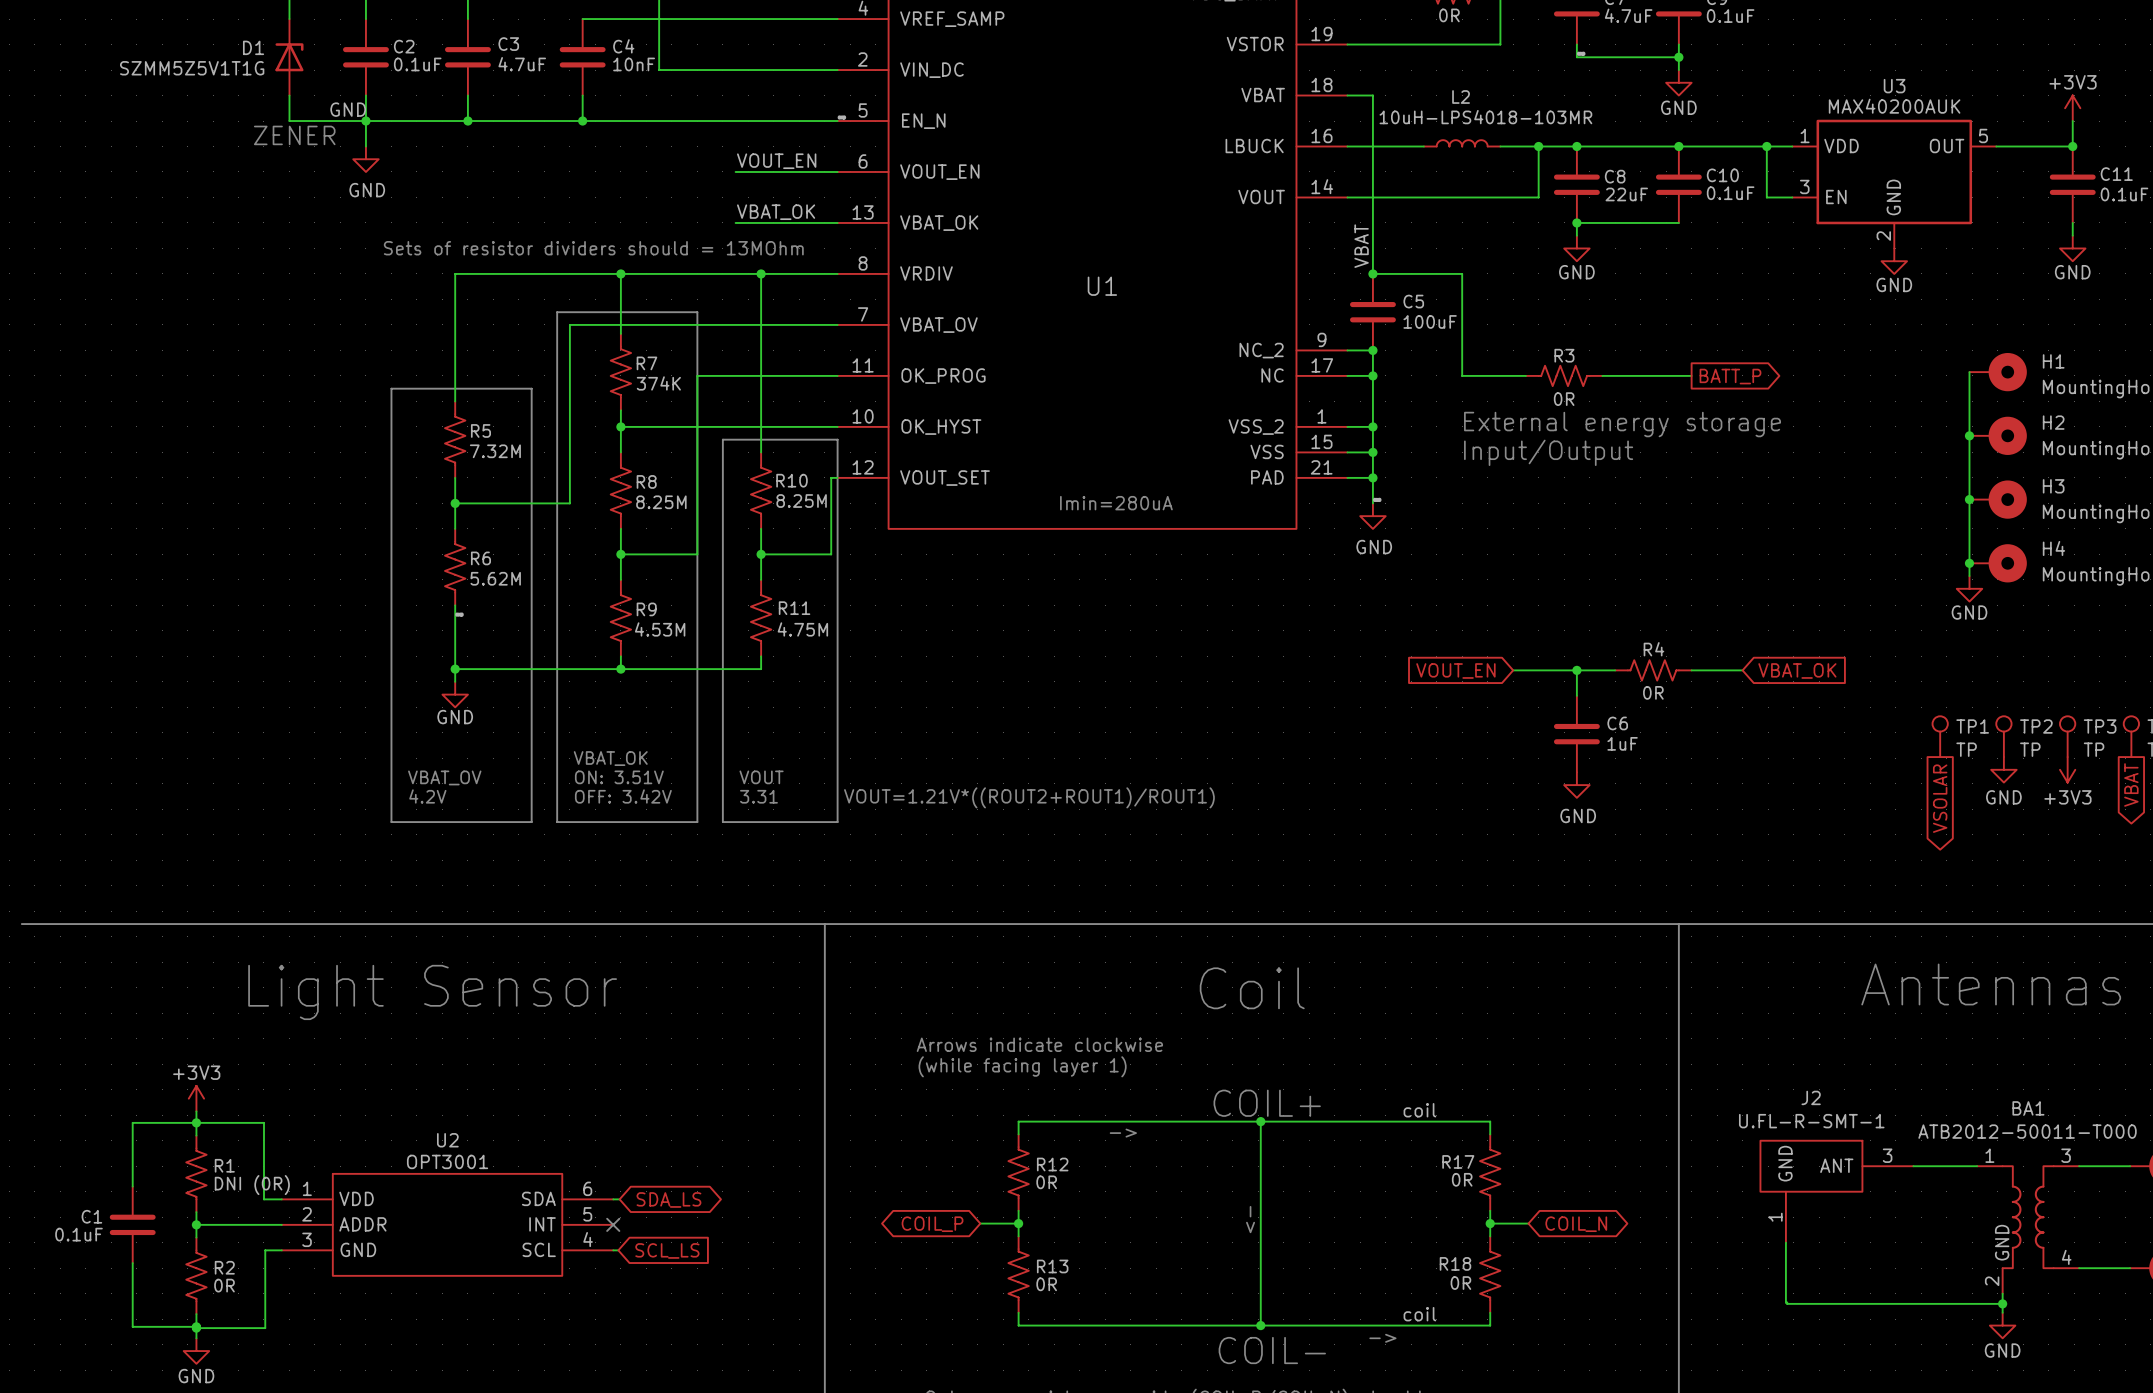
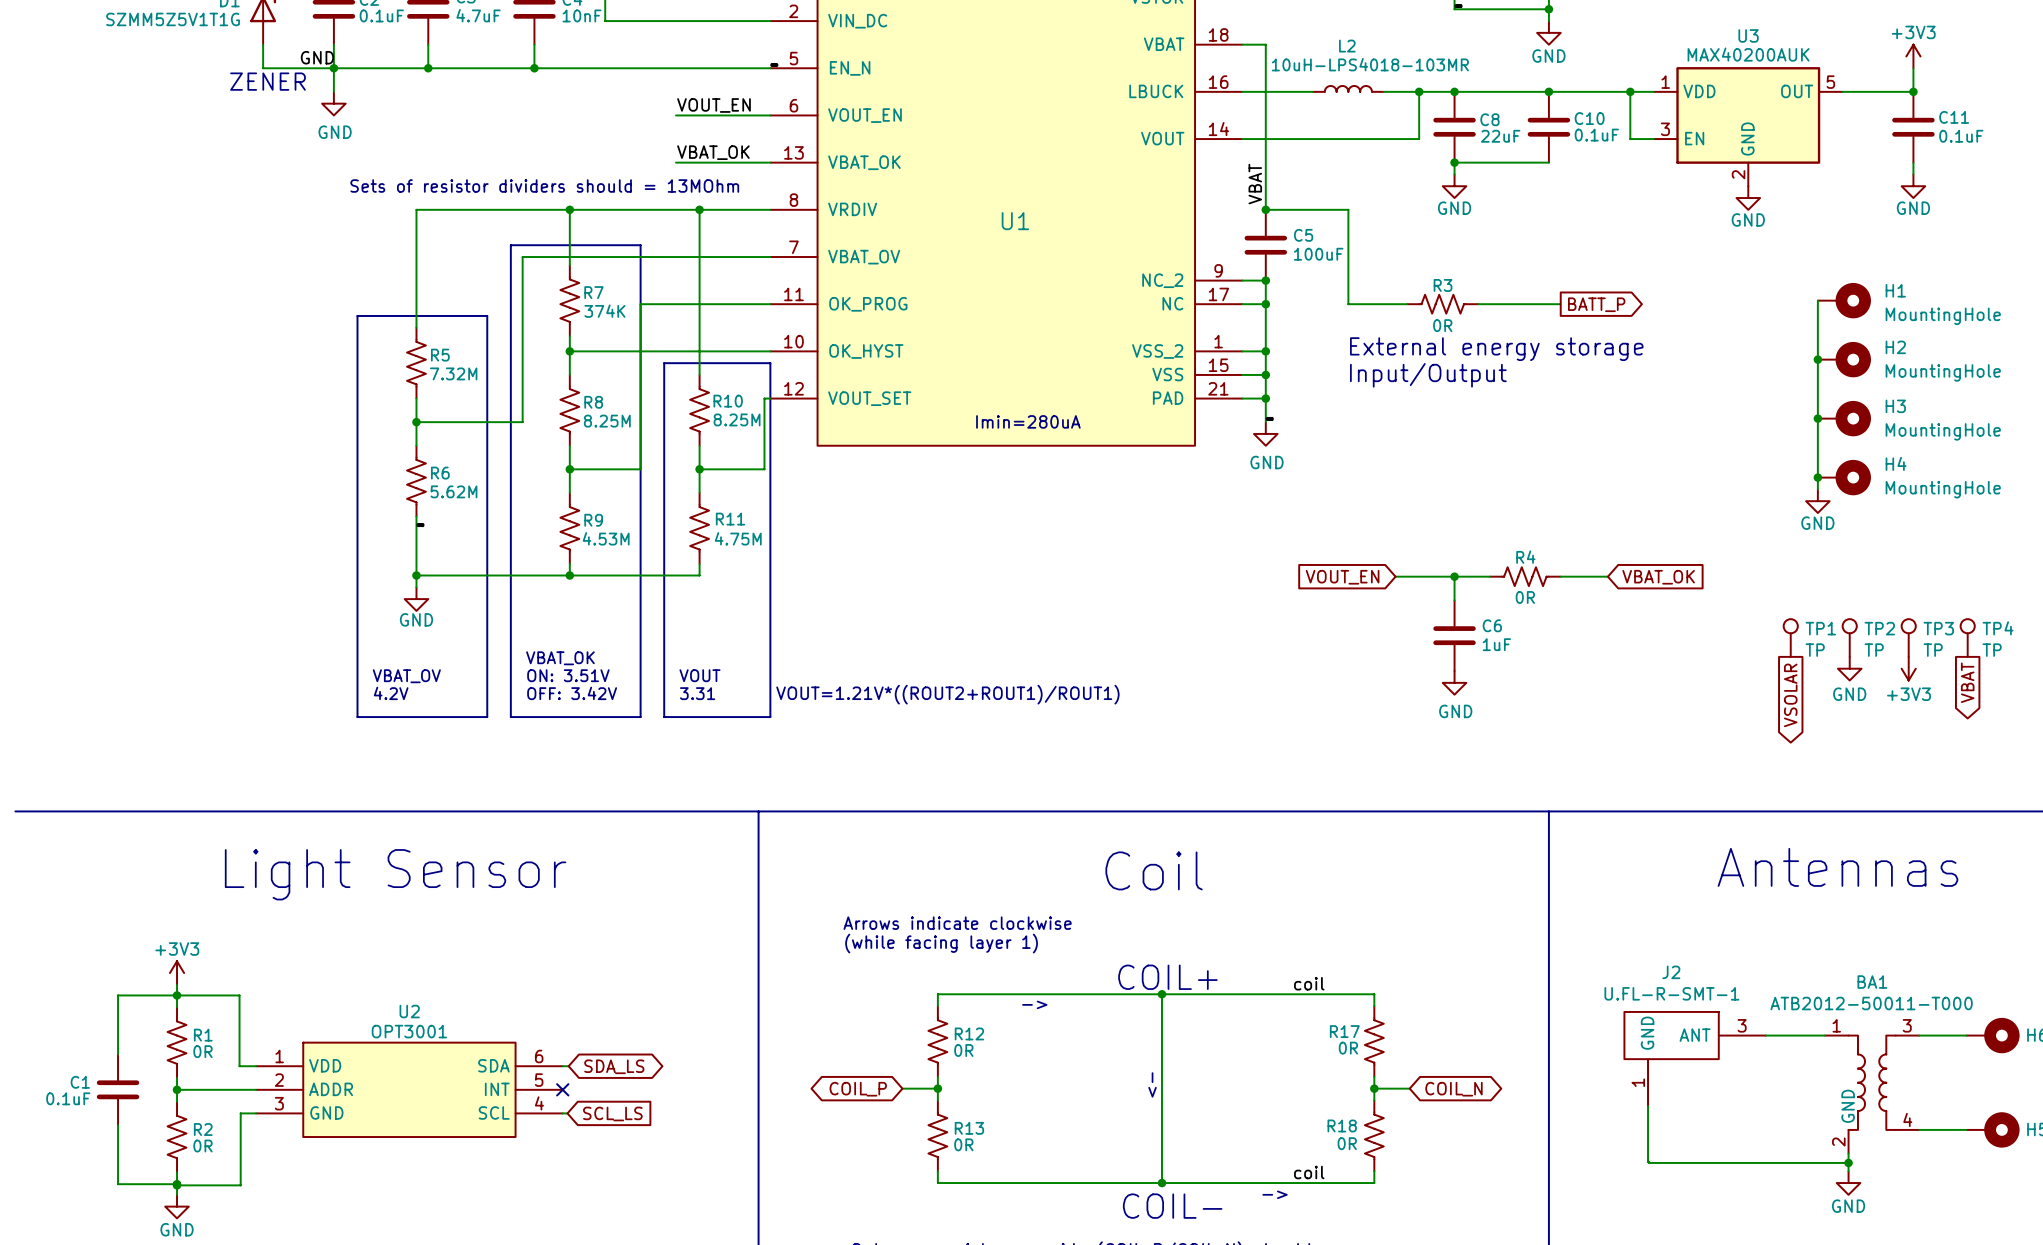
R1 value: DNI (0R) (252, 1185) -> 0R (202, 1051)

